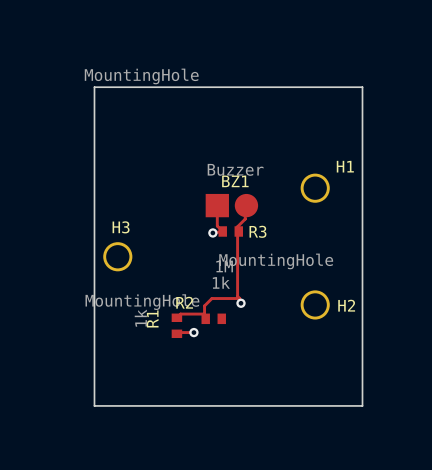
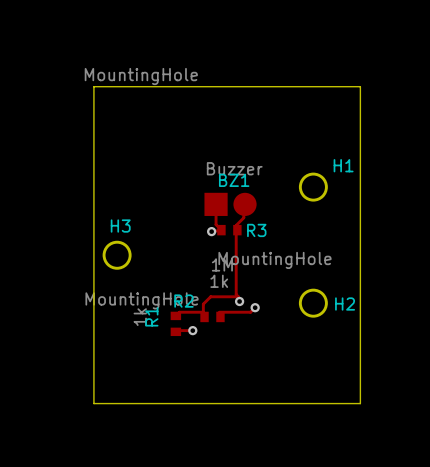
track: none -> (255, 307) (250, 312) (219, 312)
via: none -> (255, 307)

